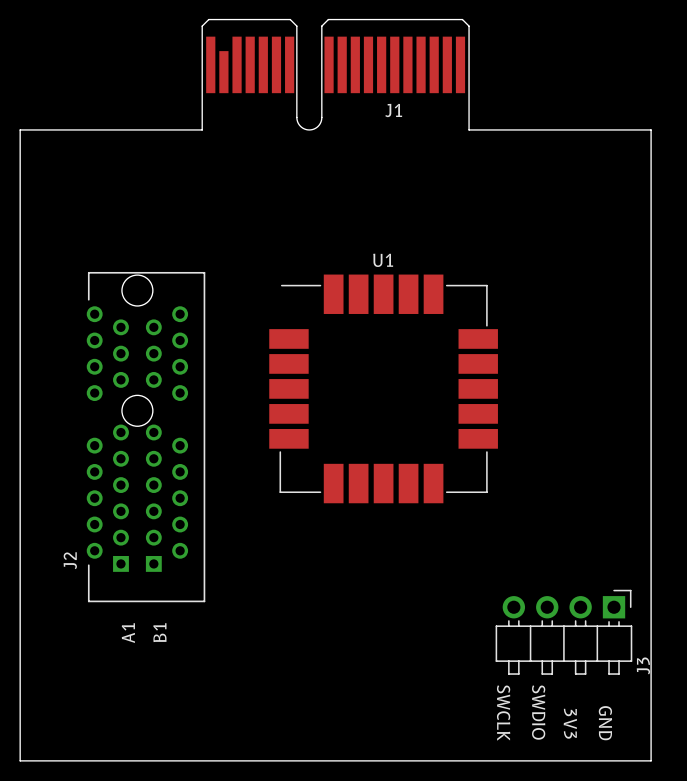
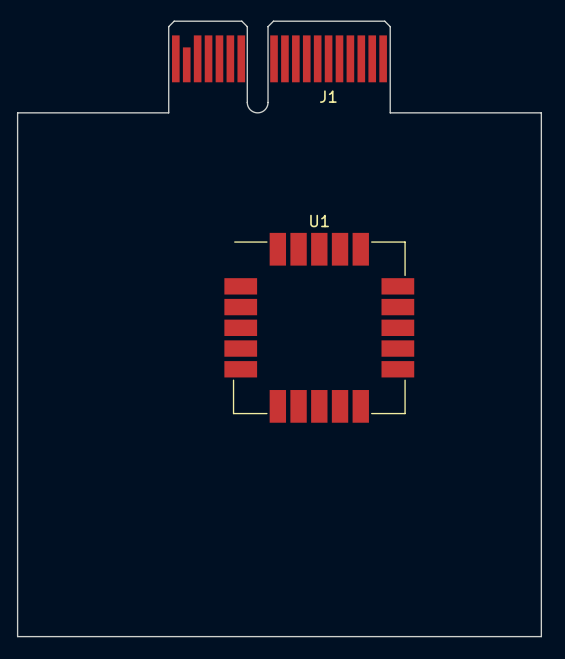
J2: (146, 437) -> none
J3: (563, 632) -> none

